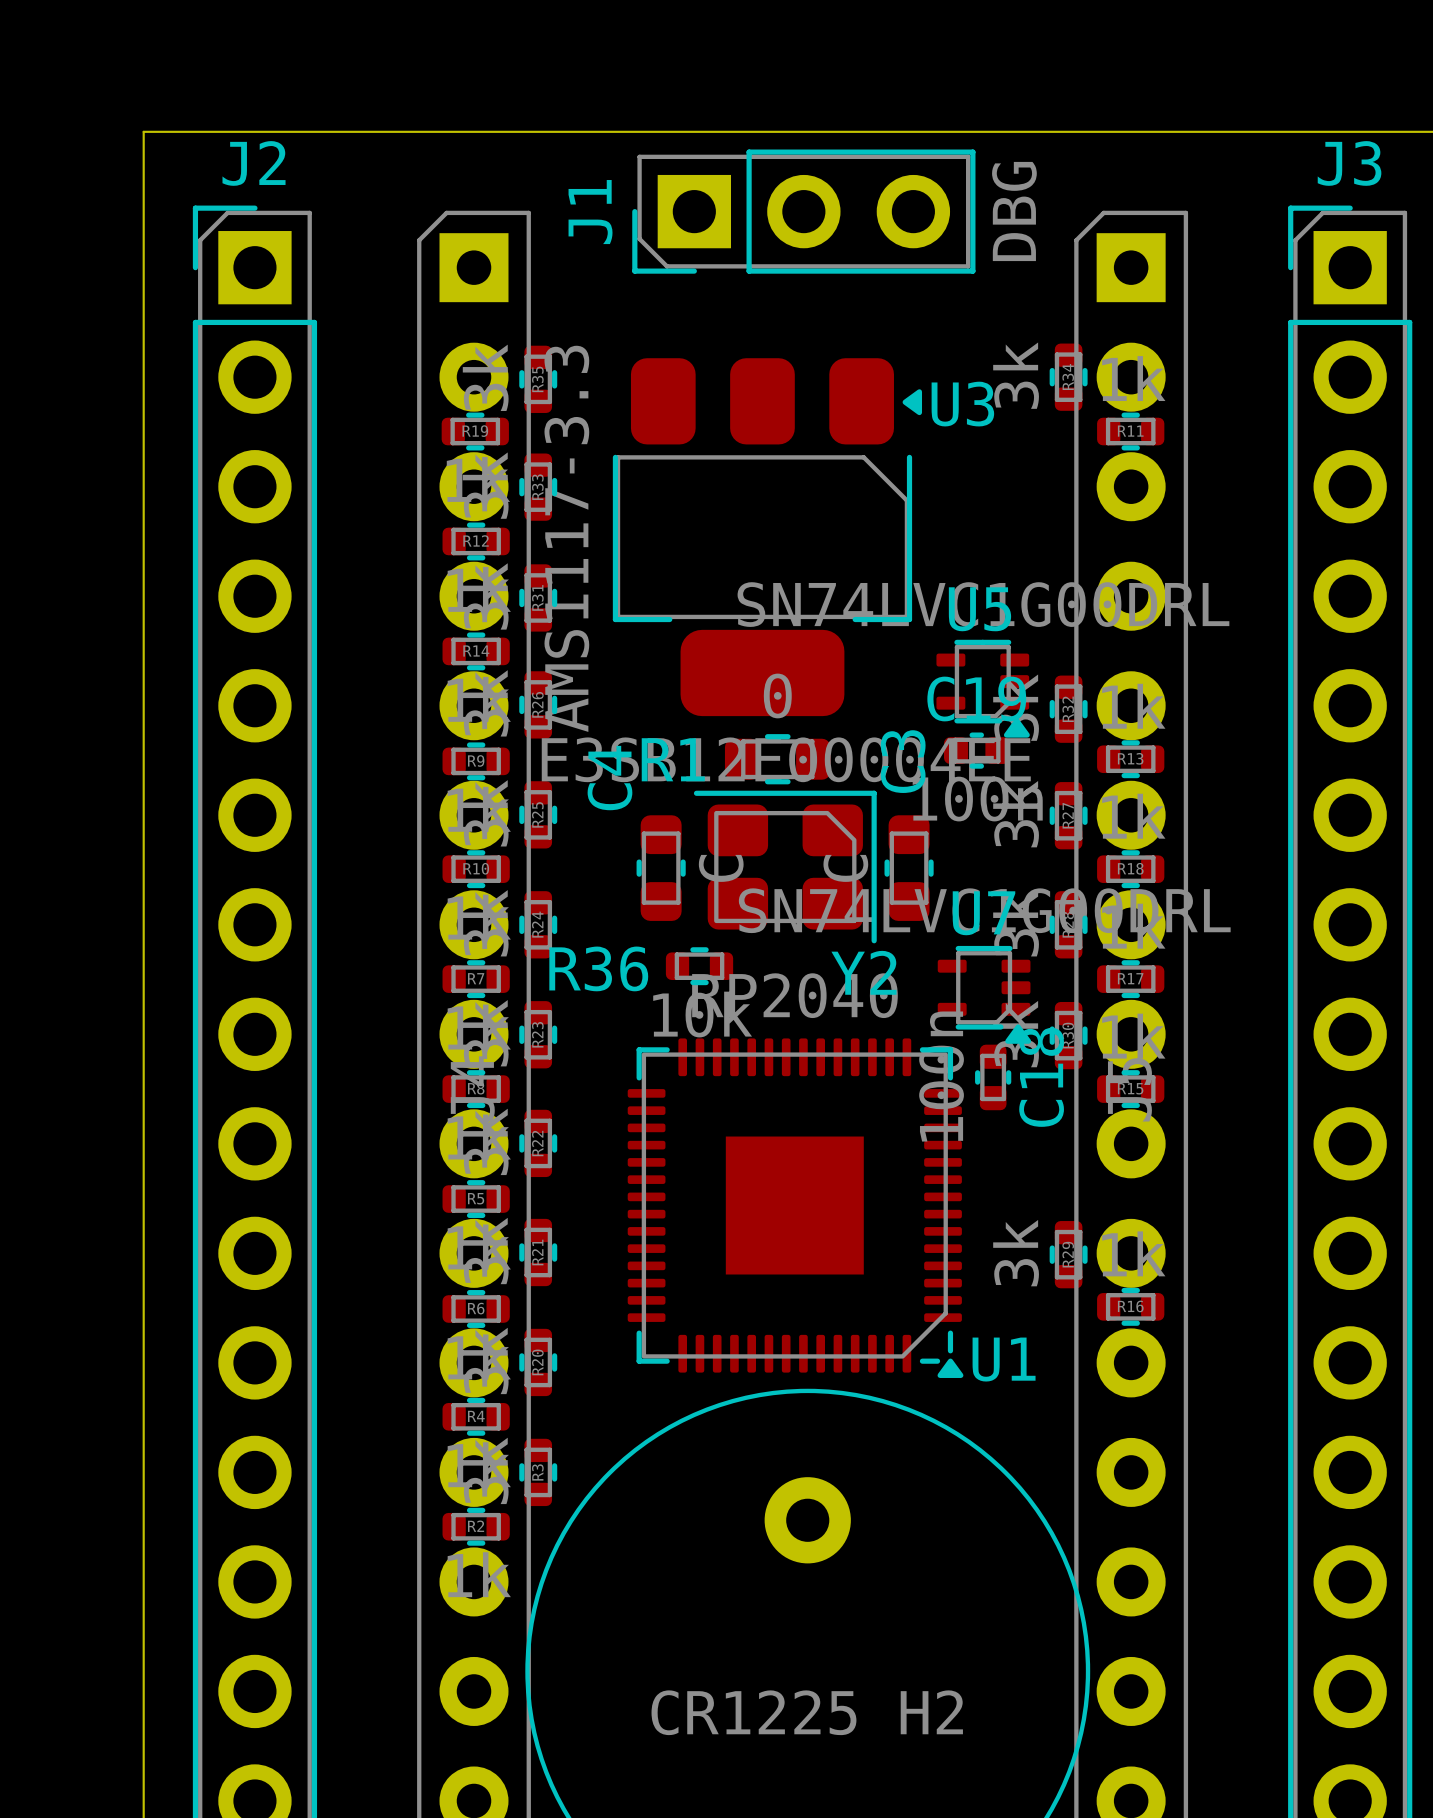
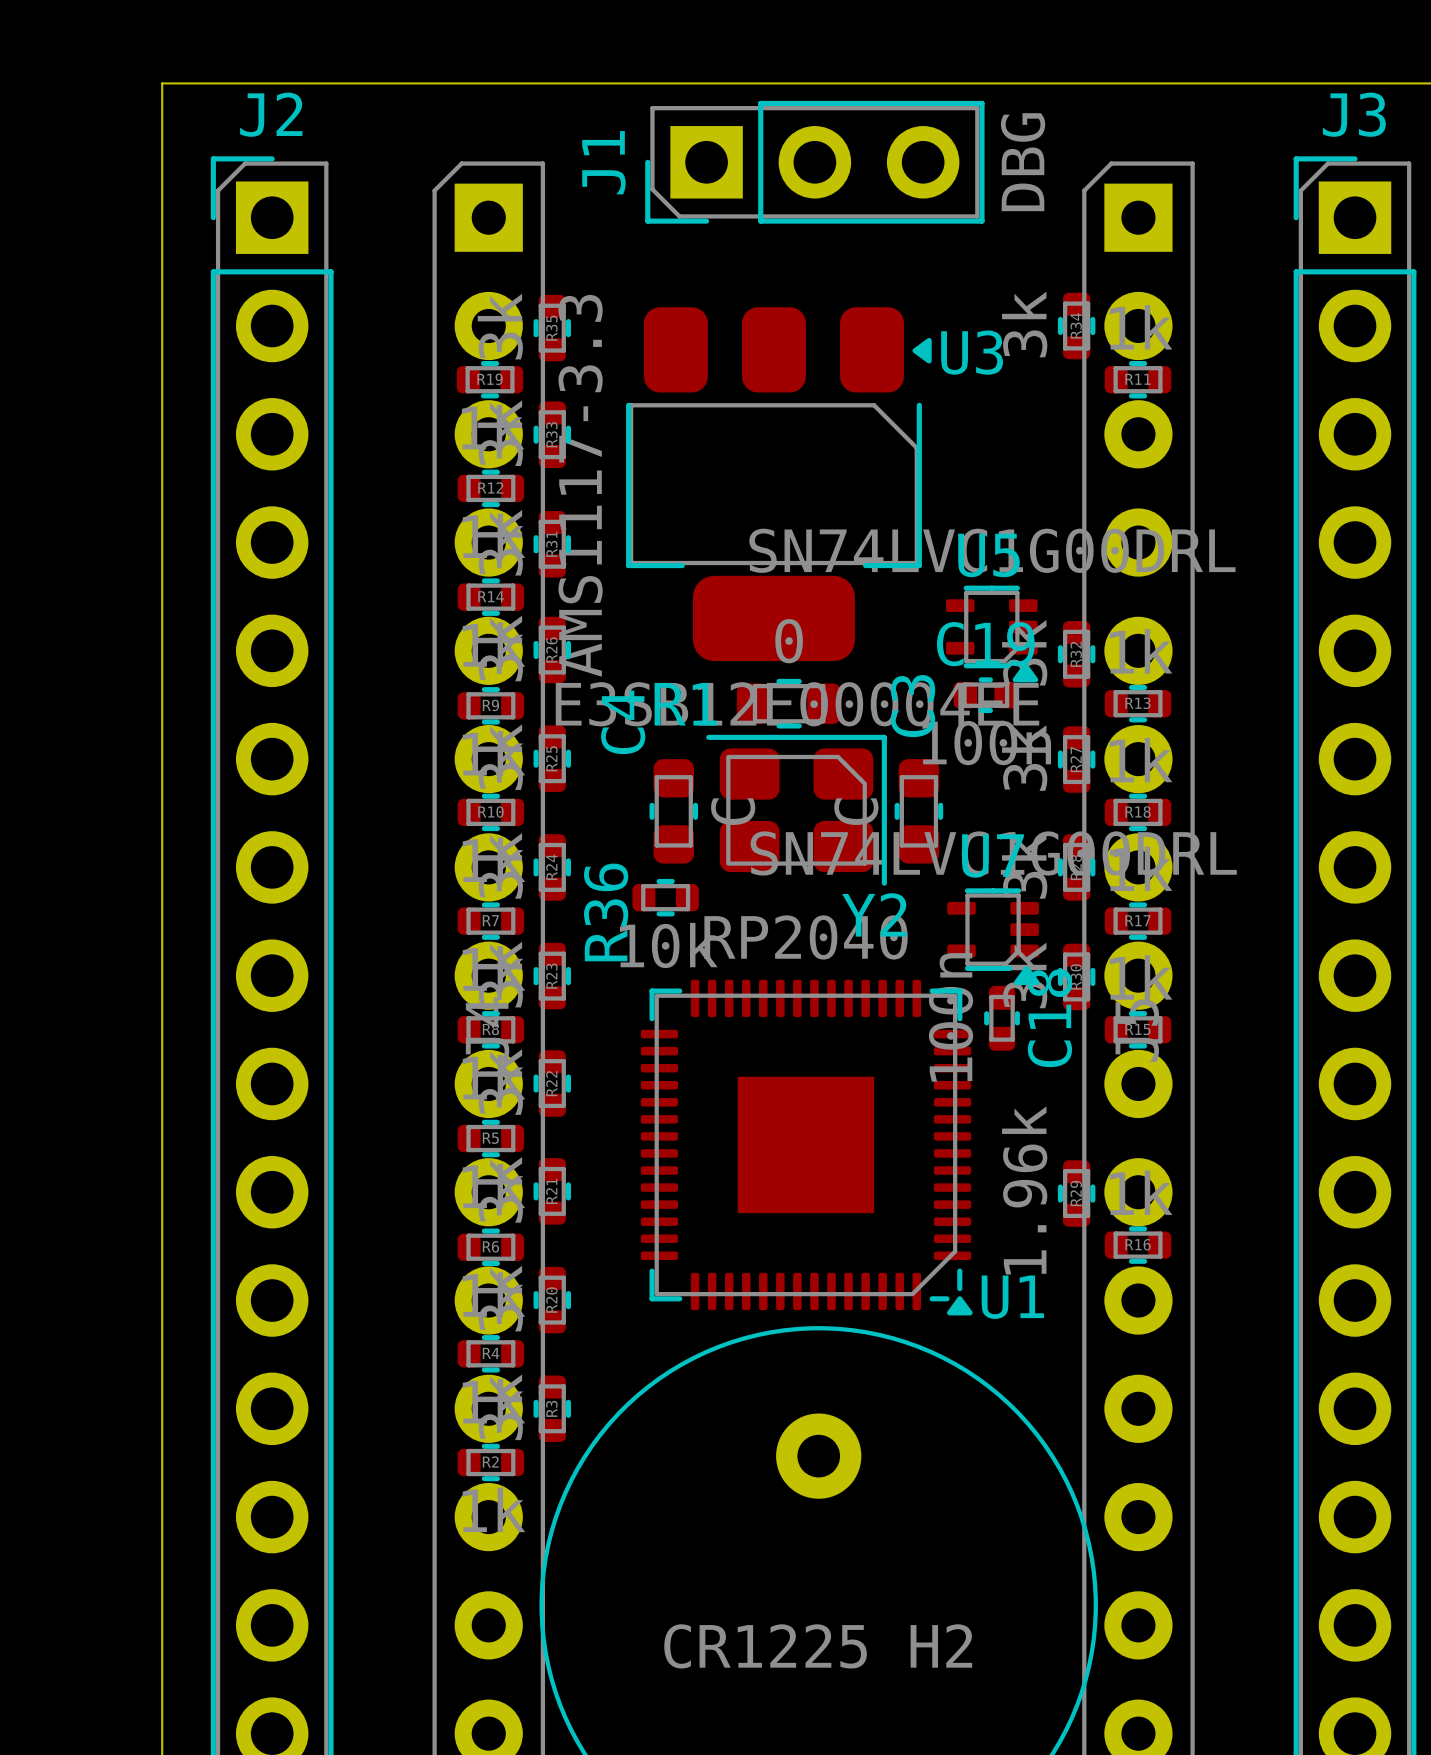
R36 position: (699, 966) -> (665, 897)
R36 name rotation: 0° (598, 968) -> 90° counterclockwise (606, 912)
R29 value: 3k (1016, 1253) -> 1.96k (1024, 1190)

